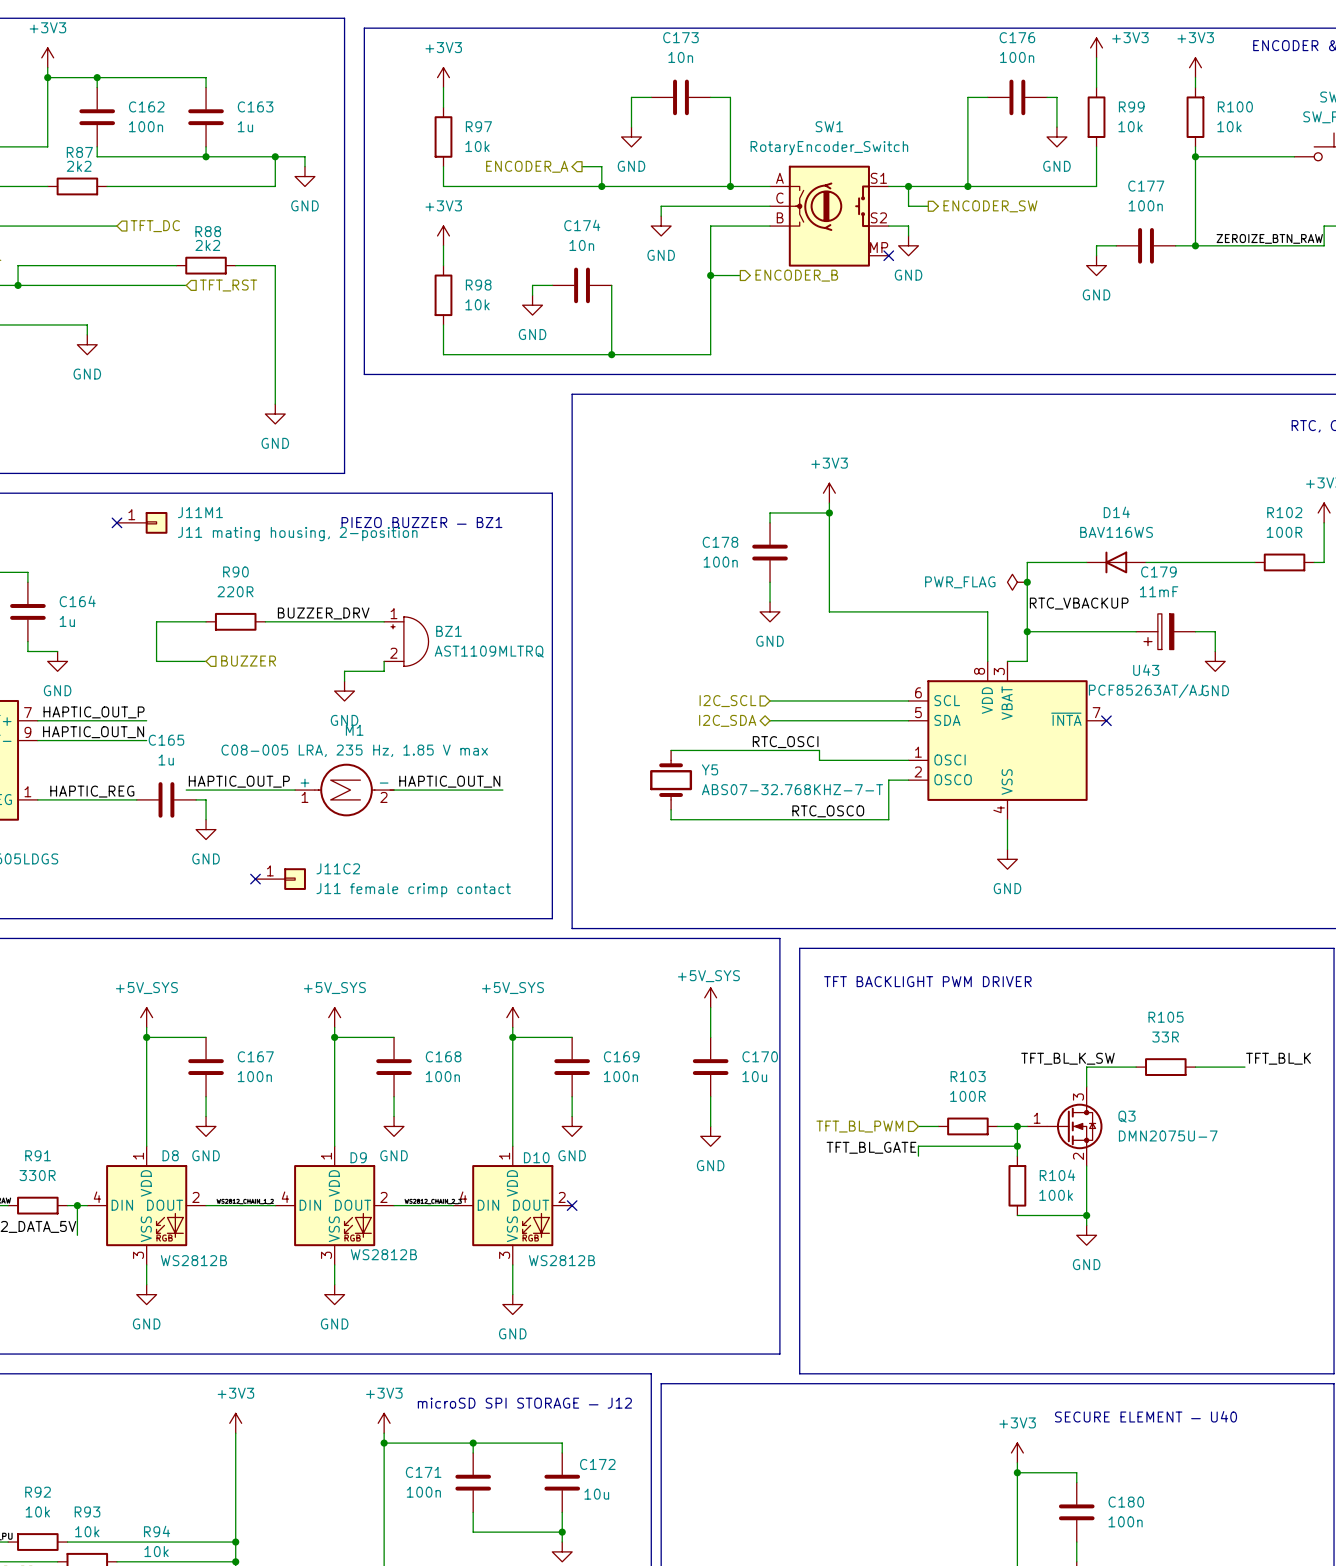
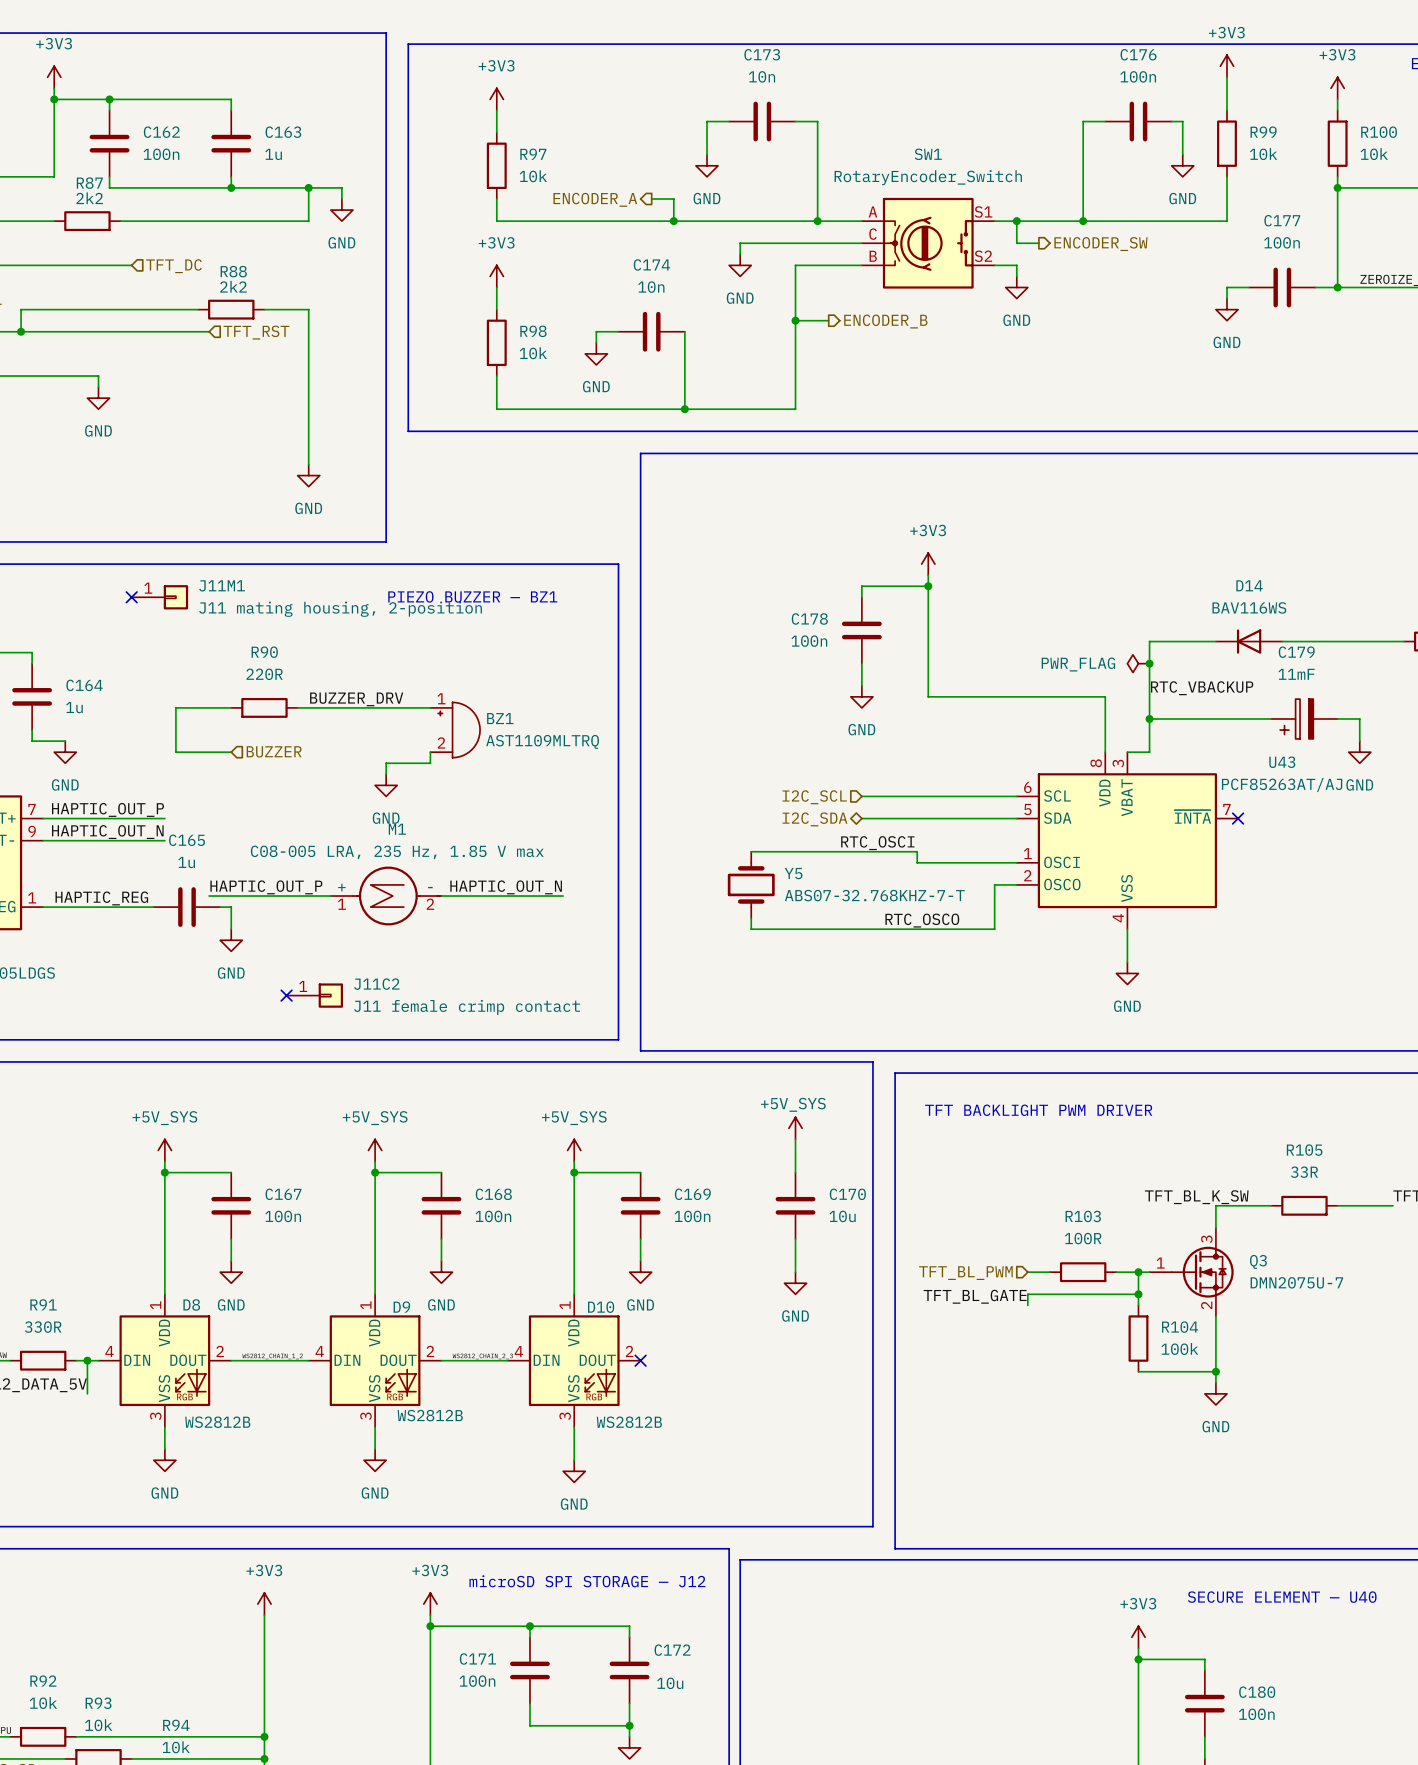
power symbol text position: +3V3 (1130, 37) -> +3V3 (1226, 32)
SW1 symbol: [770, 165, 889, 267] -> [861, 197, 995, 289]
no-connect mark: (888, 255) -> none

